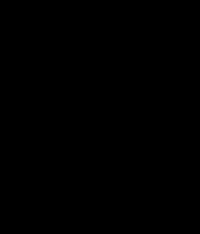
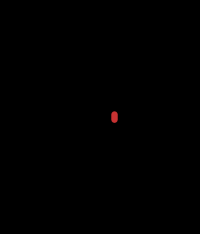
track: none -> (114, 114) (114, 119)

